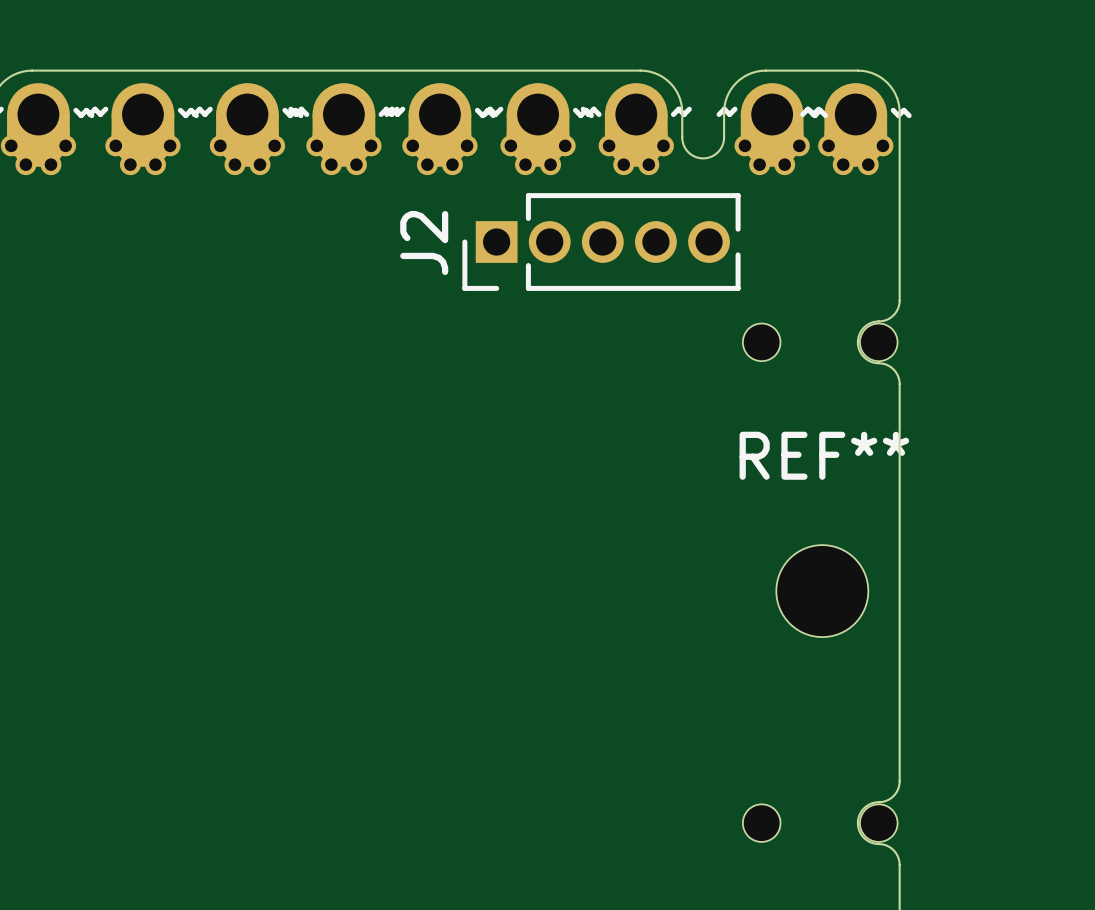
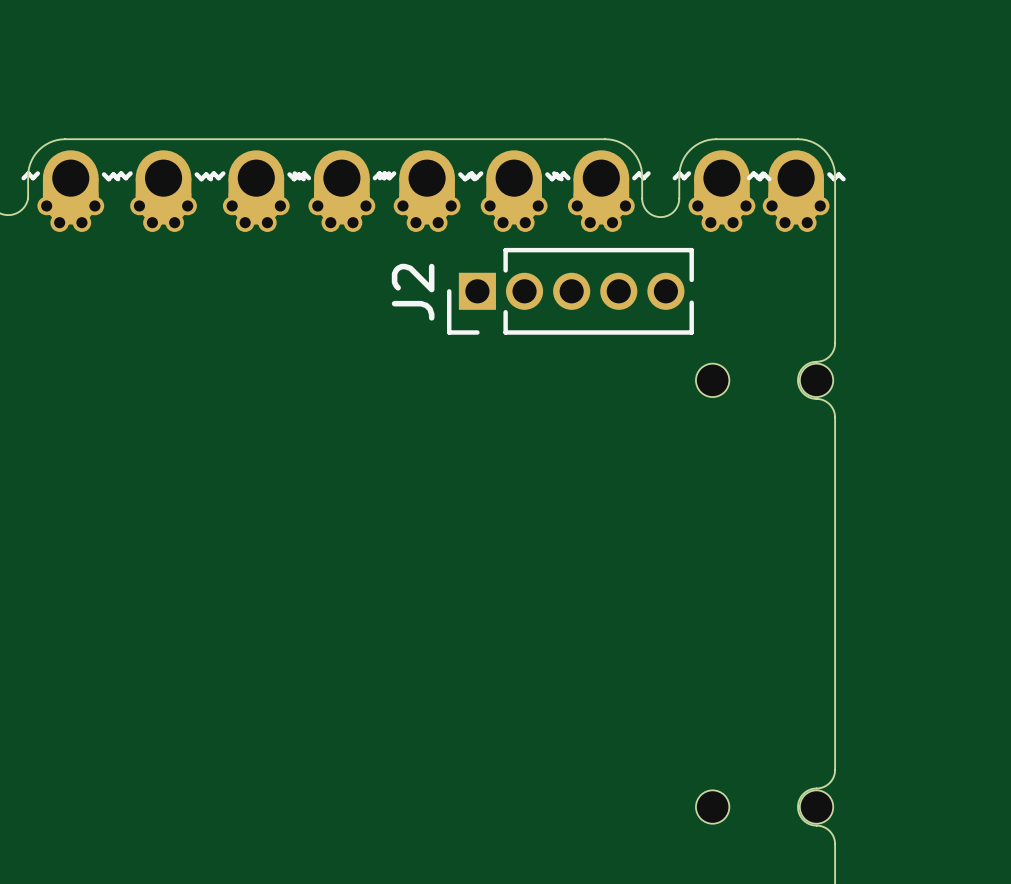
REF**: (822, 591) -> none

